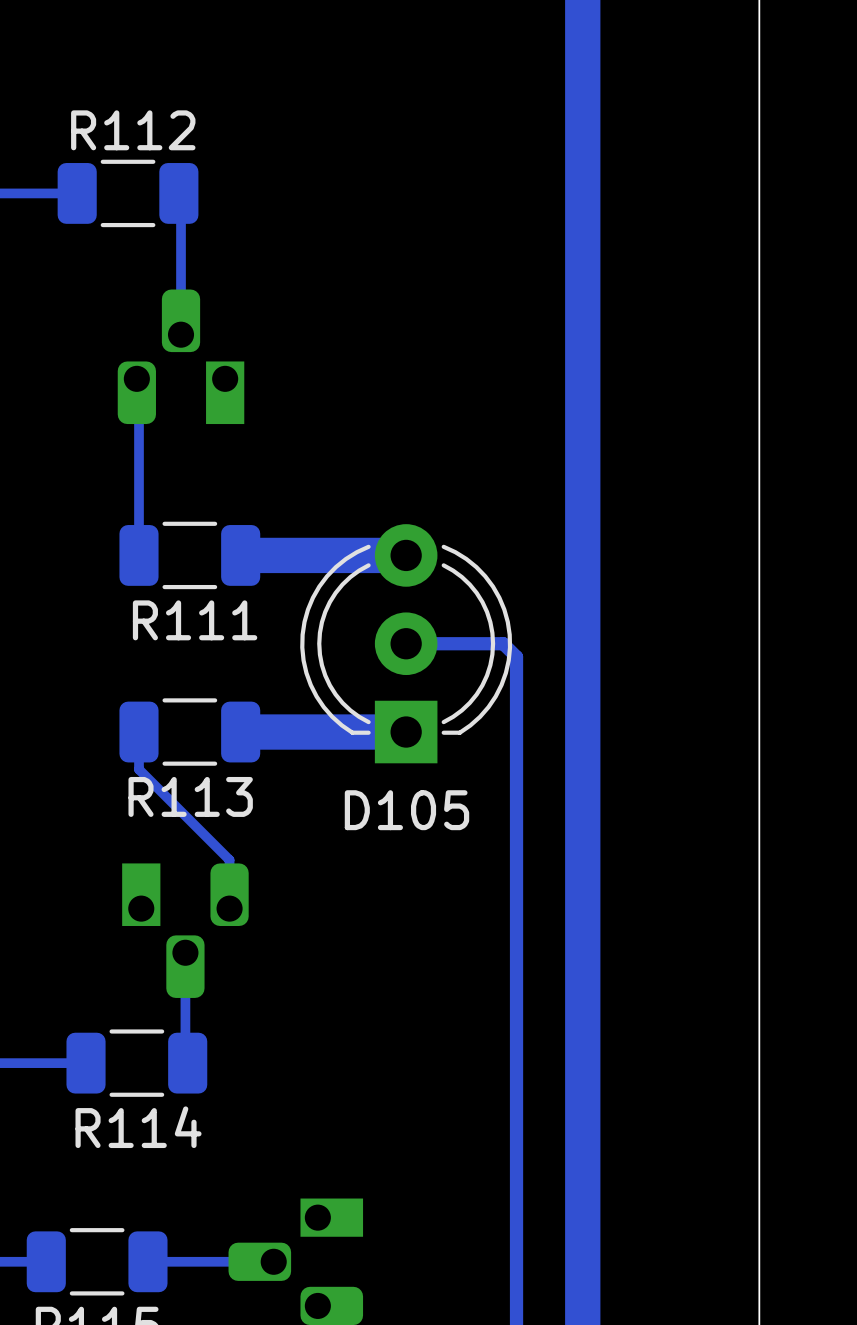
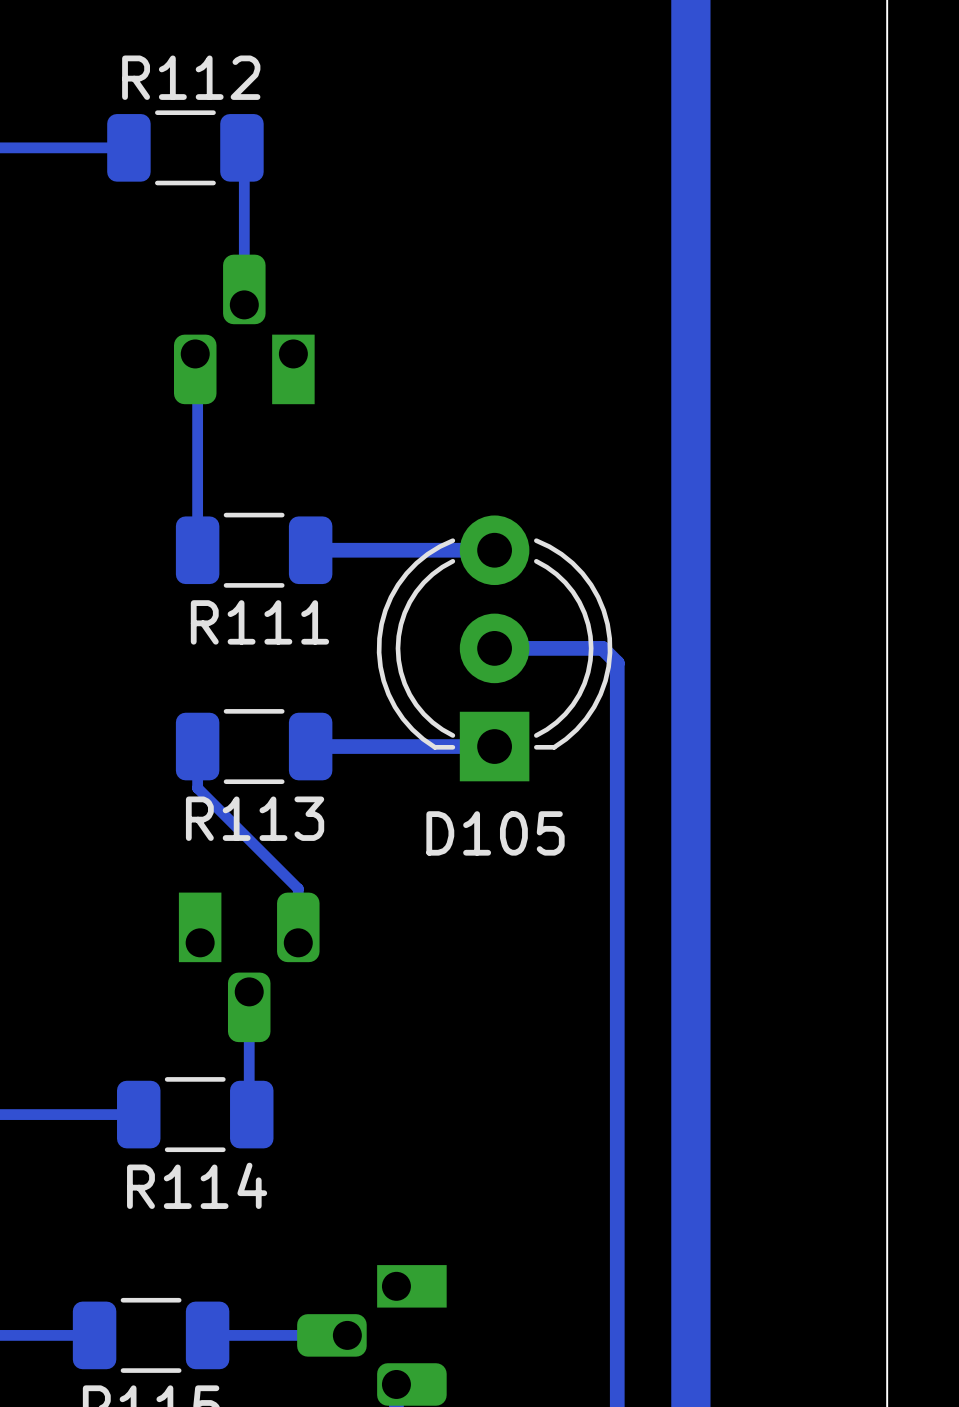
bottom track width: thick (406, 555) (240, 555) -> thin (494, 550) (310, 550)
bottom track width: thick (406, 732) (240, 732) -> thin (494, 746) (310, 746)

